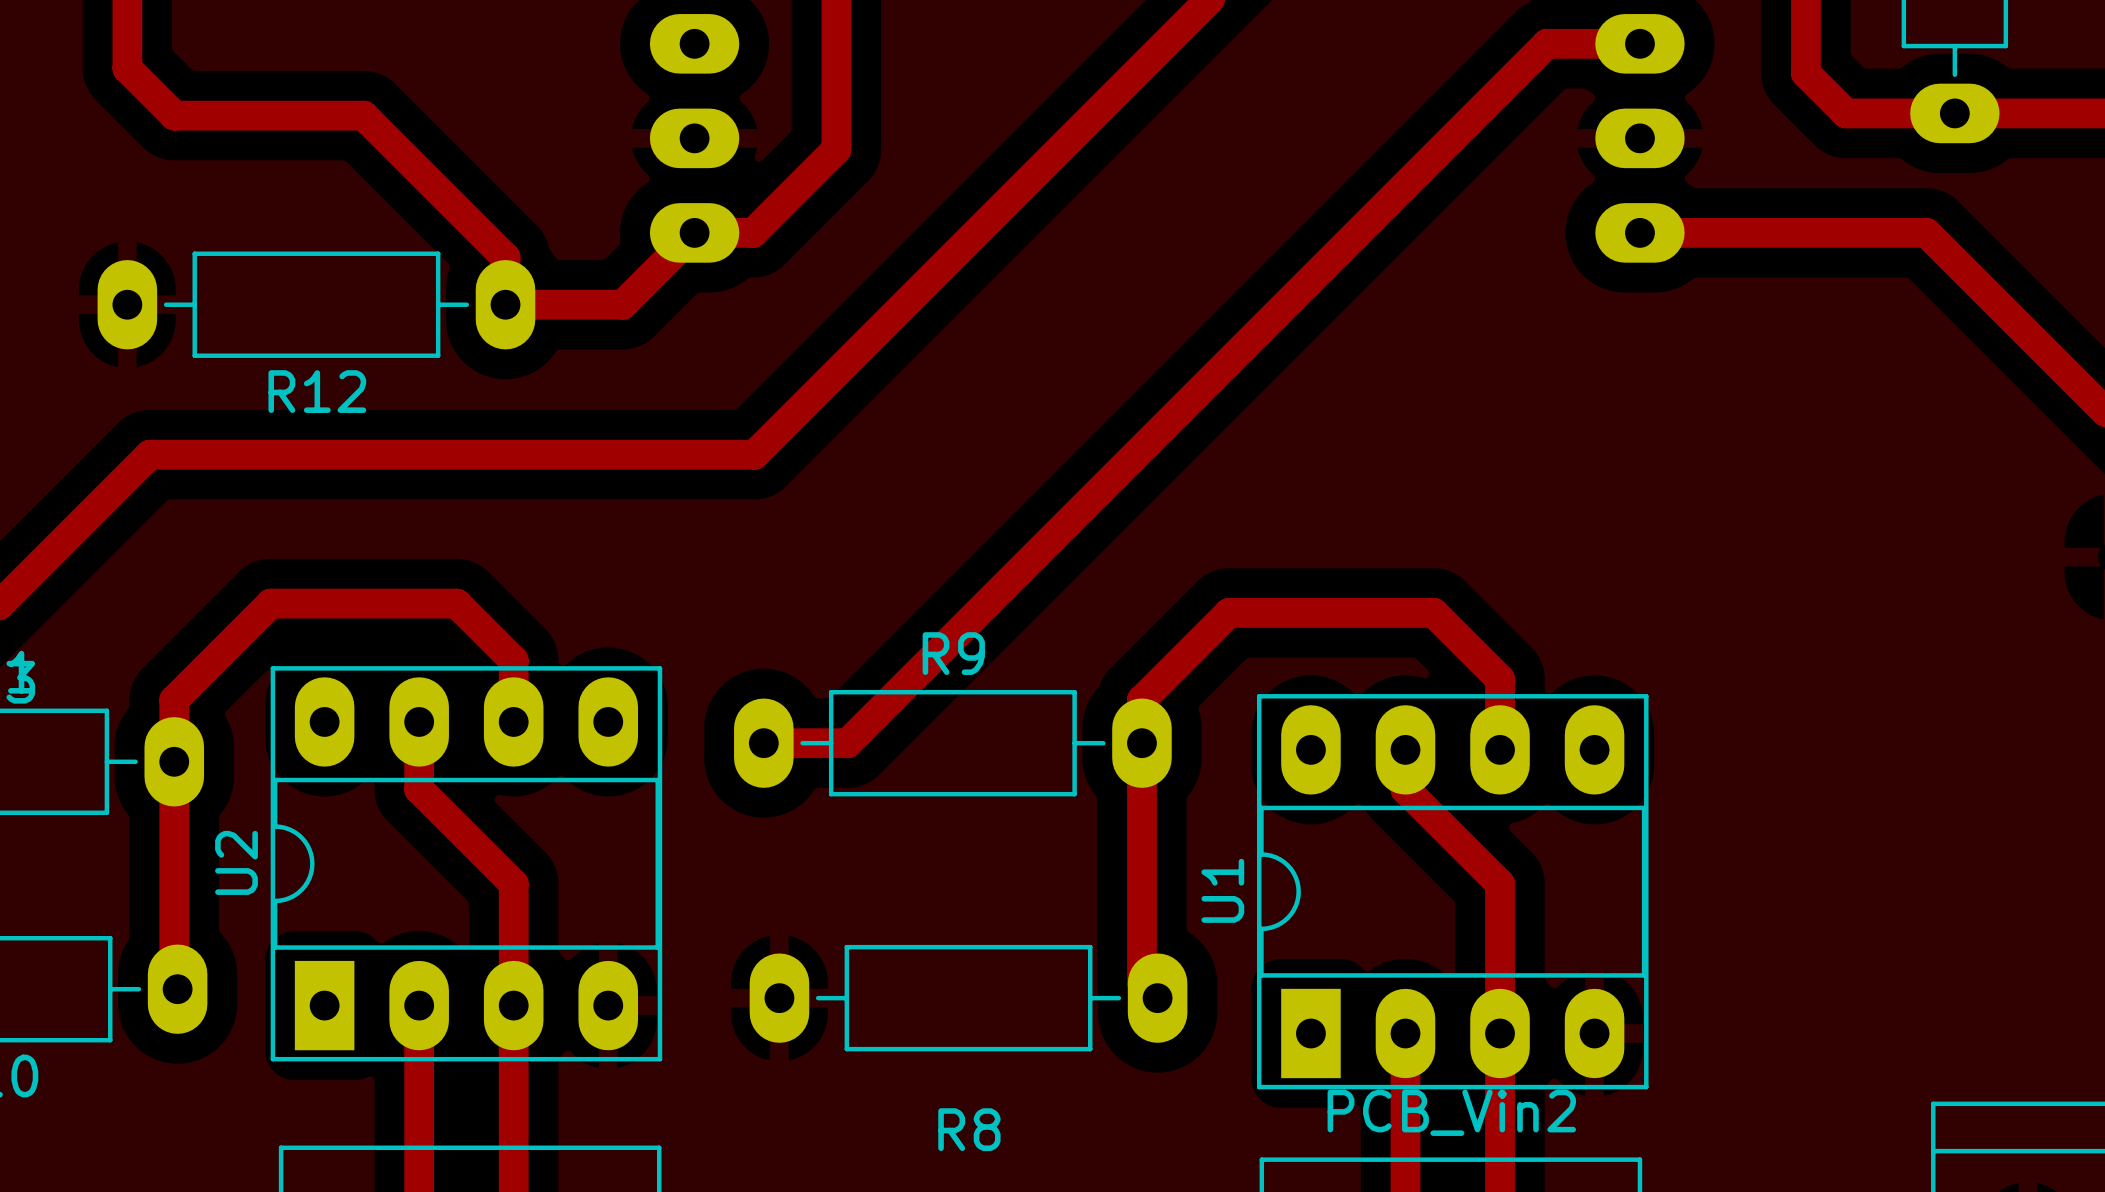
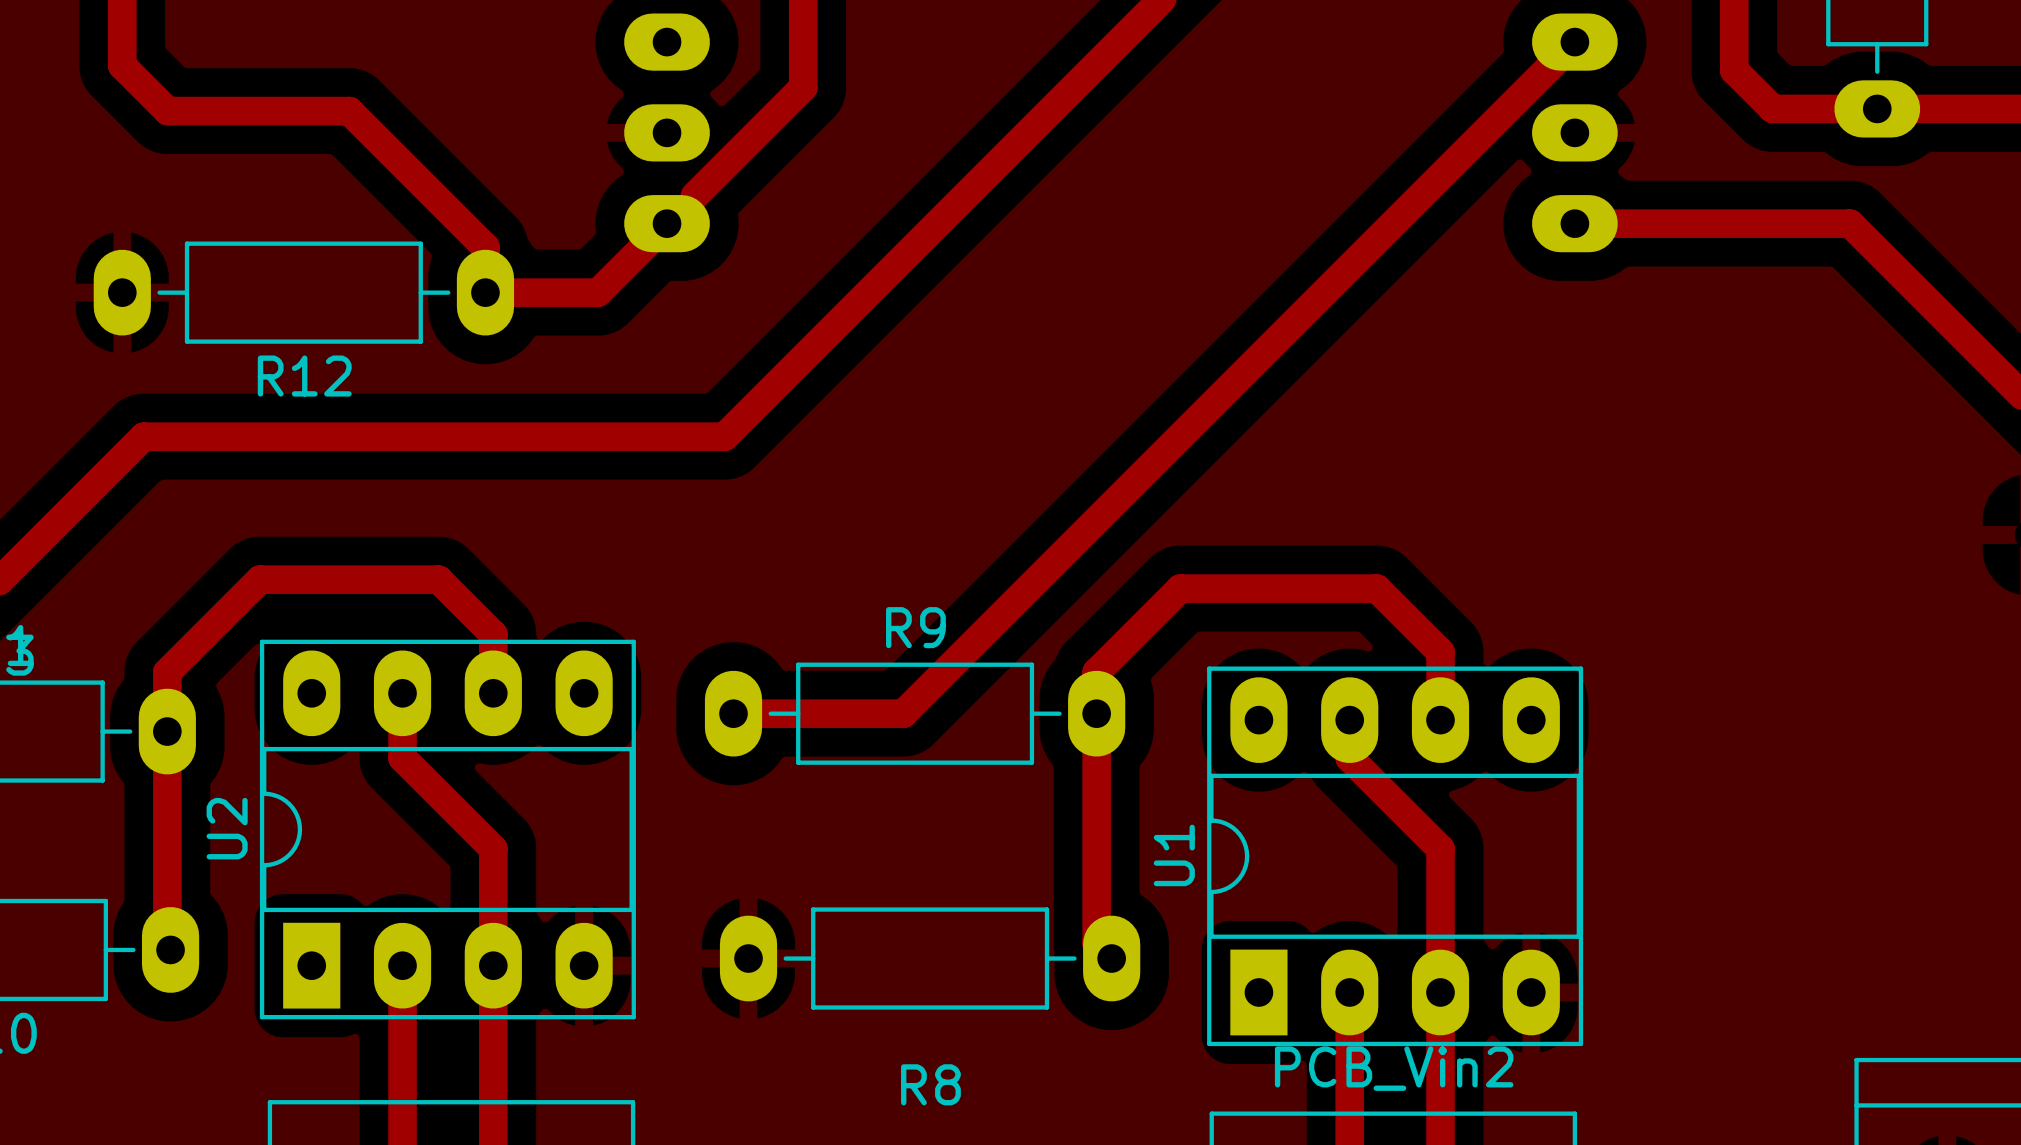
track: (1639, 43) (1546, 43) (847, 743) -> (1574, 42) (903, 713) (813, 713)
track: (836, 91) (836, 149) (753, 232) (694, 232) -> (803, 87) (694, 195)

